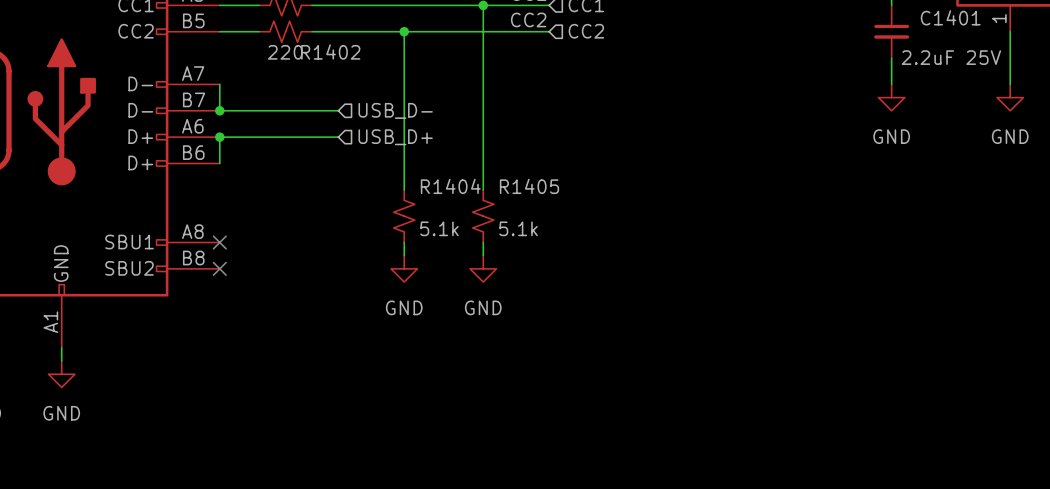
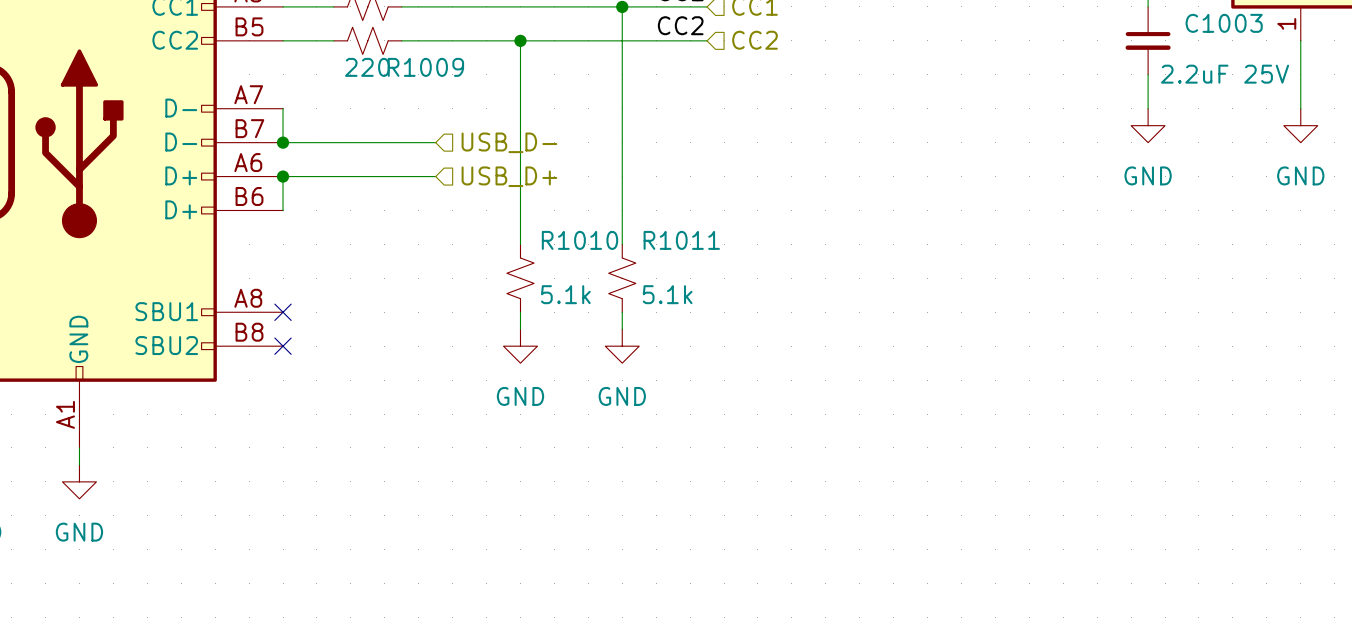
C1401 name: C1401 (950, 17) -> C1003 (1224, 23)
R1402 name: R1402 (330, 52) -> R1009 (425, 67)
R1404 name: R1404 (450, 186) -> R1010 (579, 240)
R1405 name: R1405 (529, 186) -> R1011 (681, 240)

